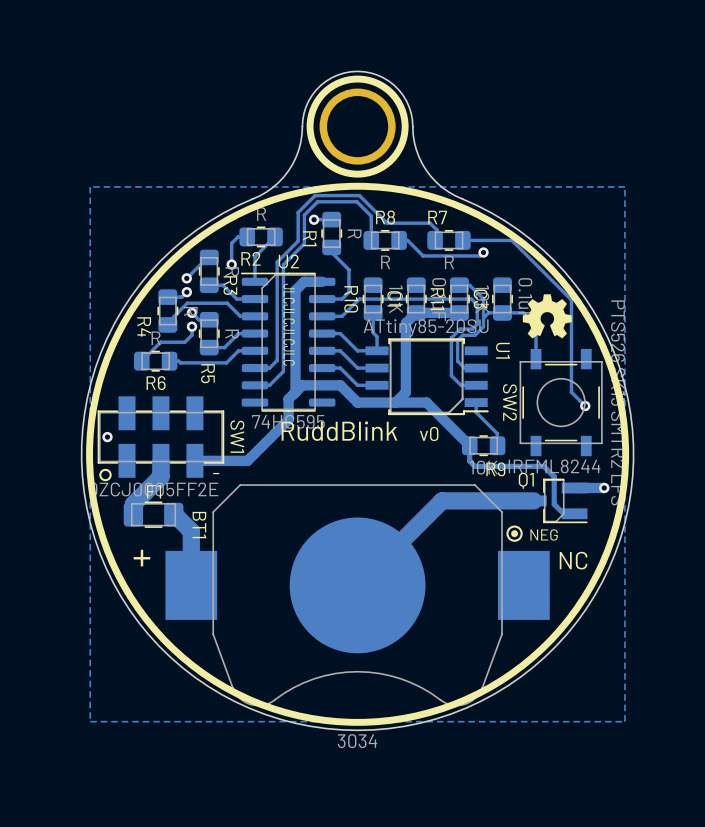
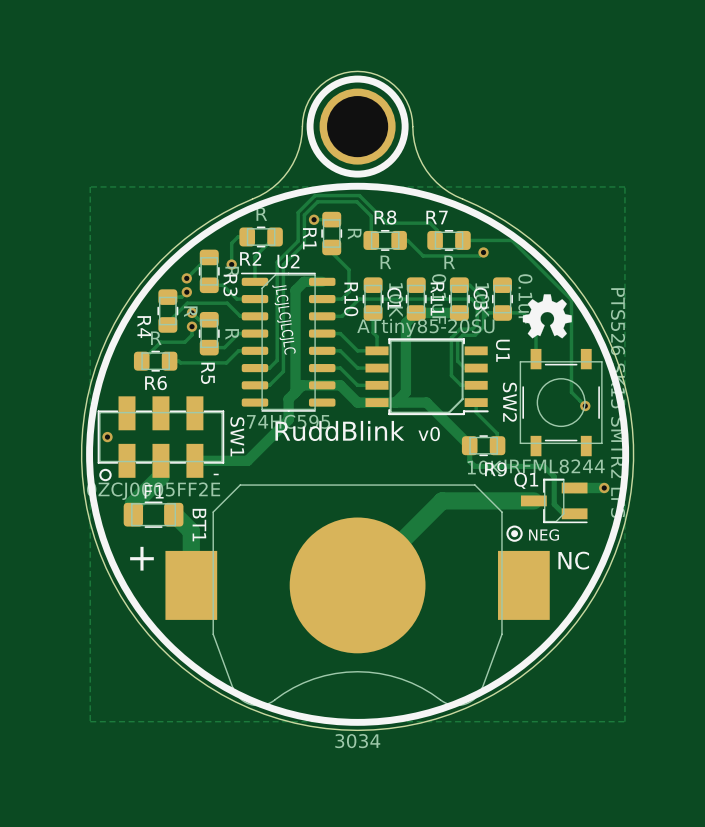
text rotation: 0° (289, 324) -> 8° counterclockwise (283, 319)

